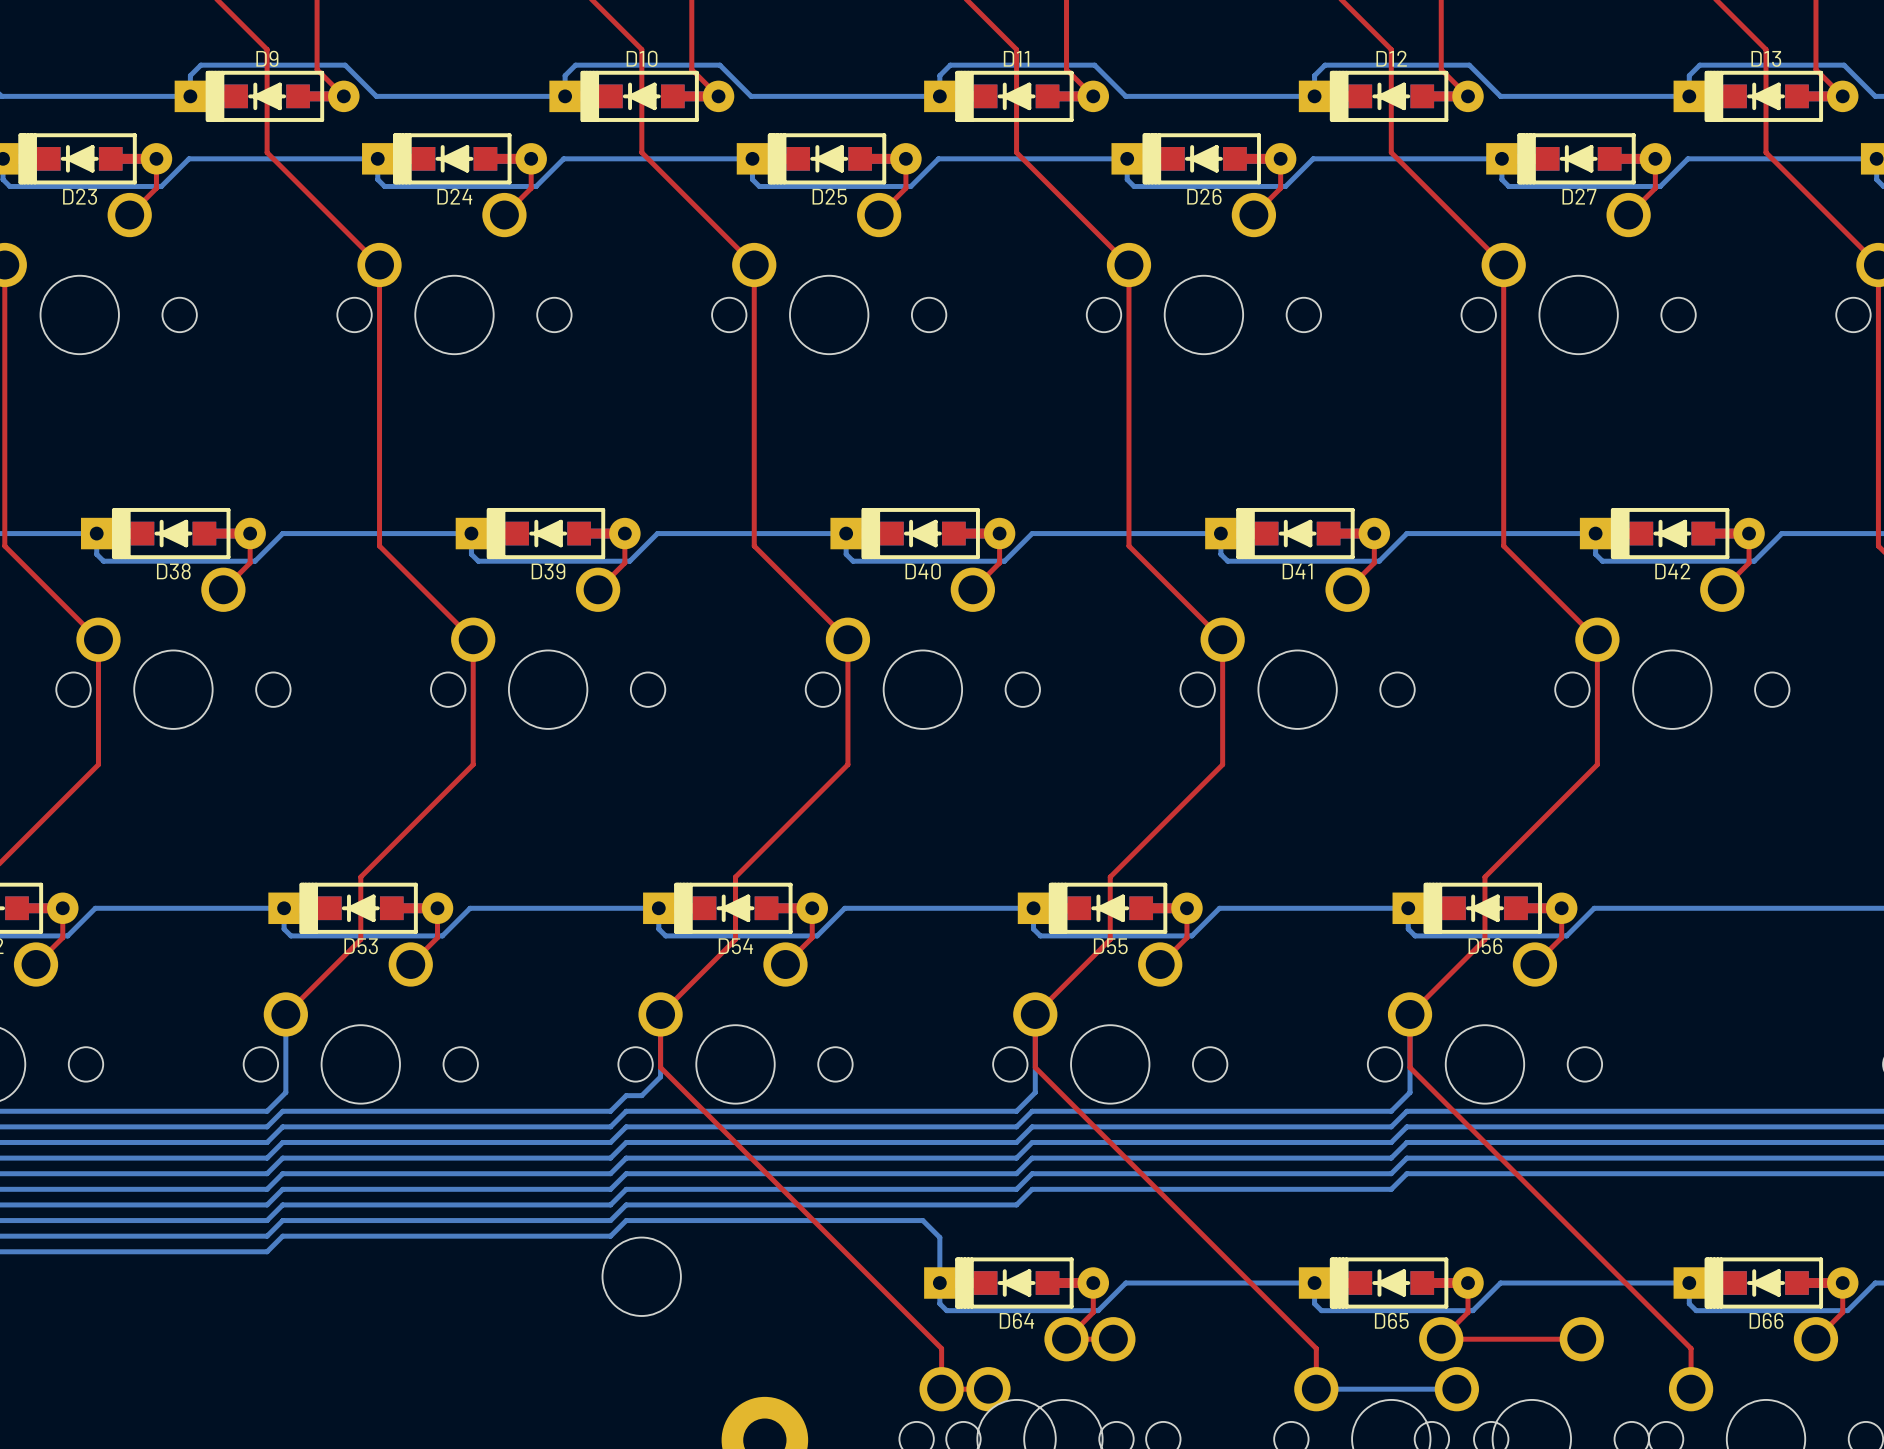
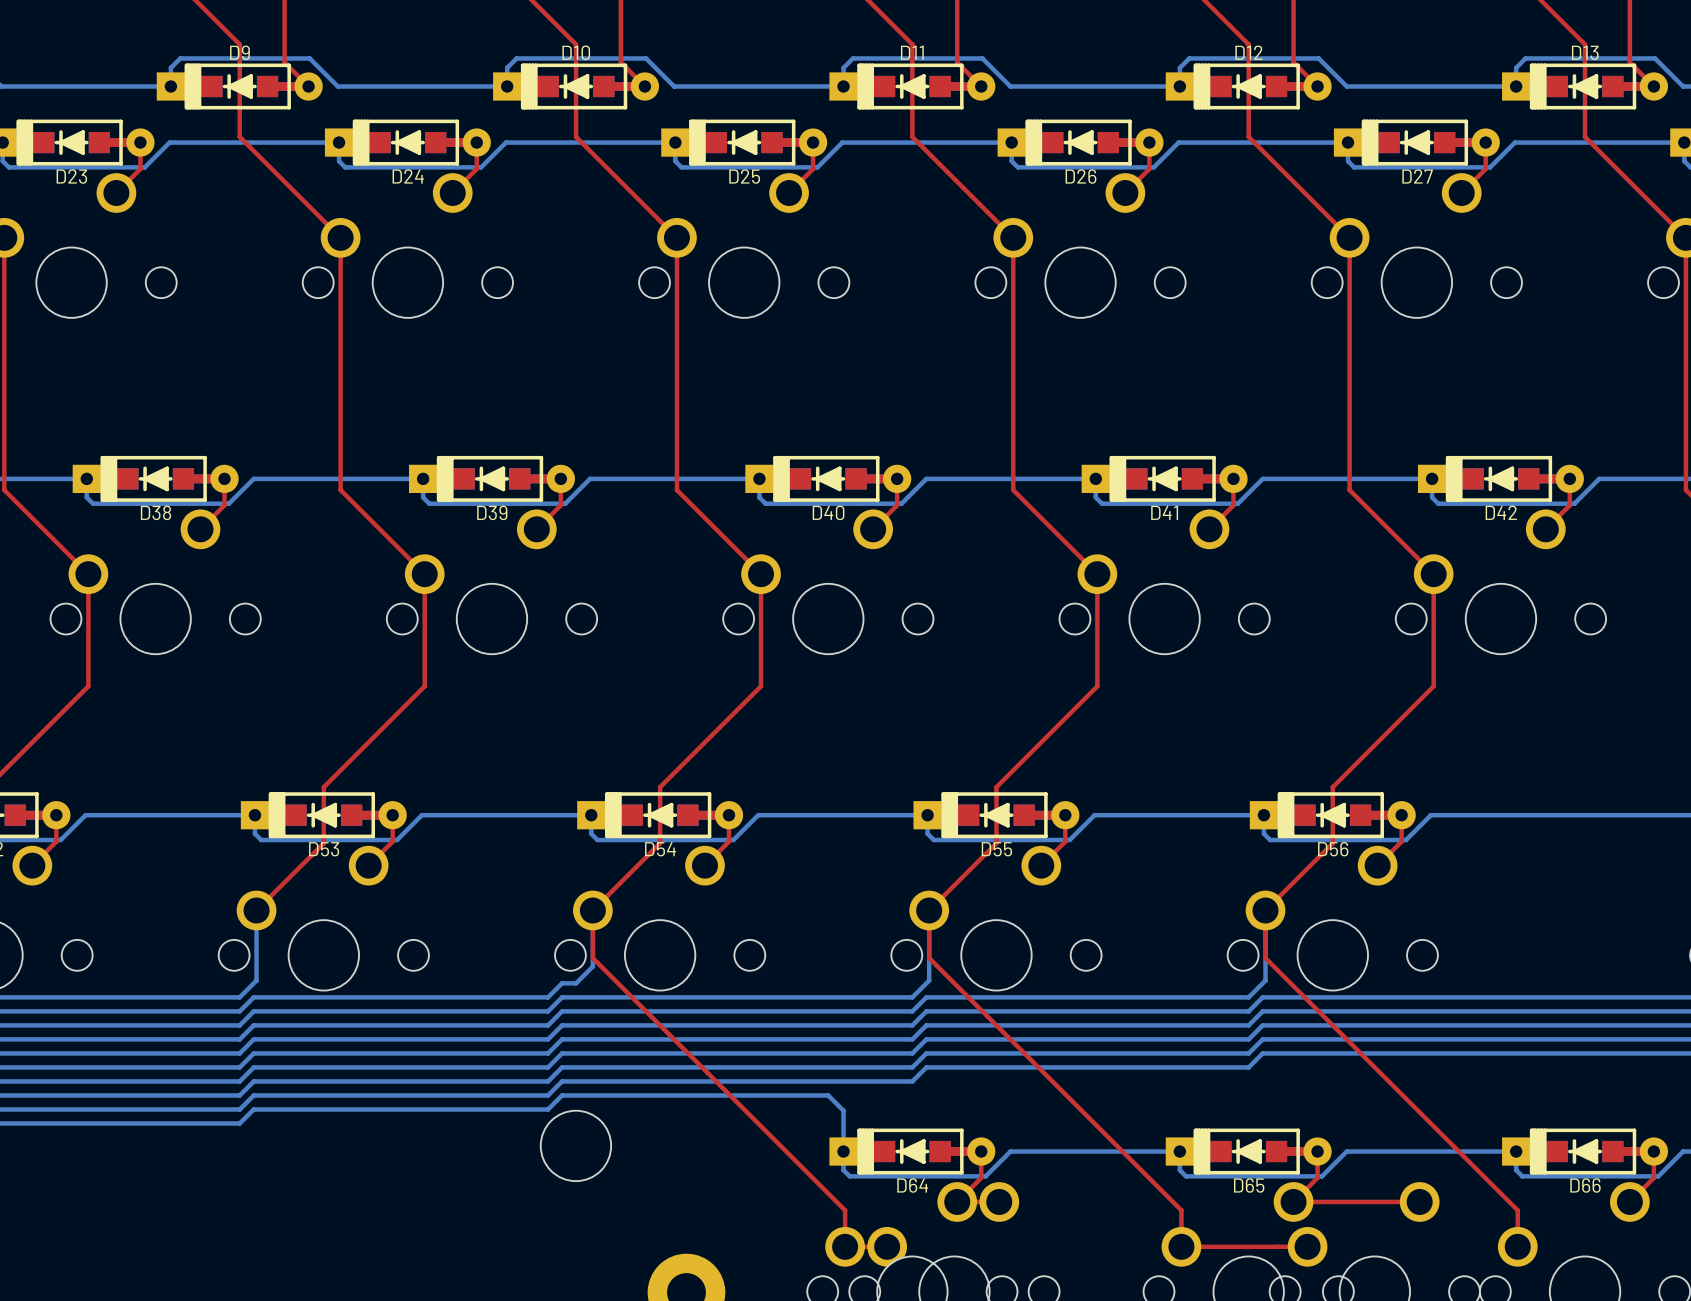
bottom track: (1316, 1389) (1456, 1389) -> none
top track: none -> (1181, 1246) (1307, 1246)

